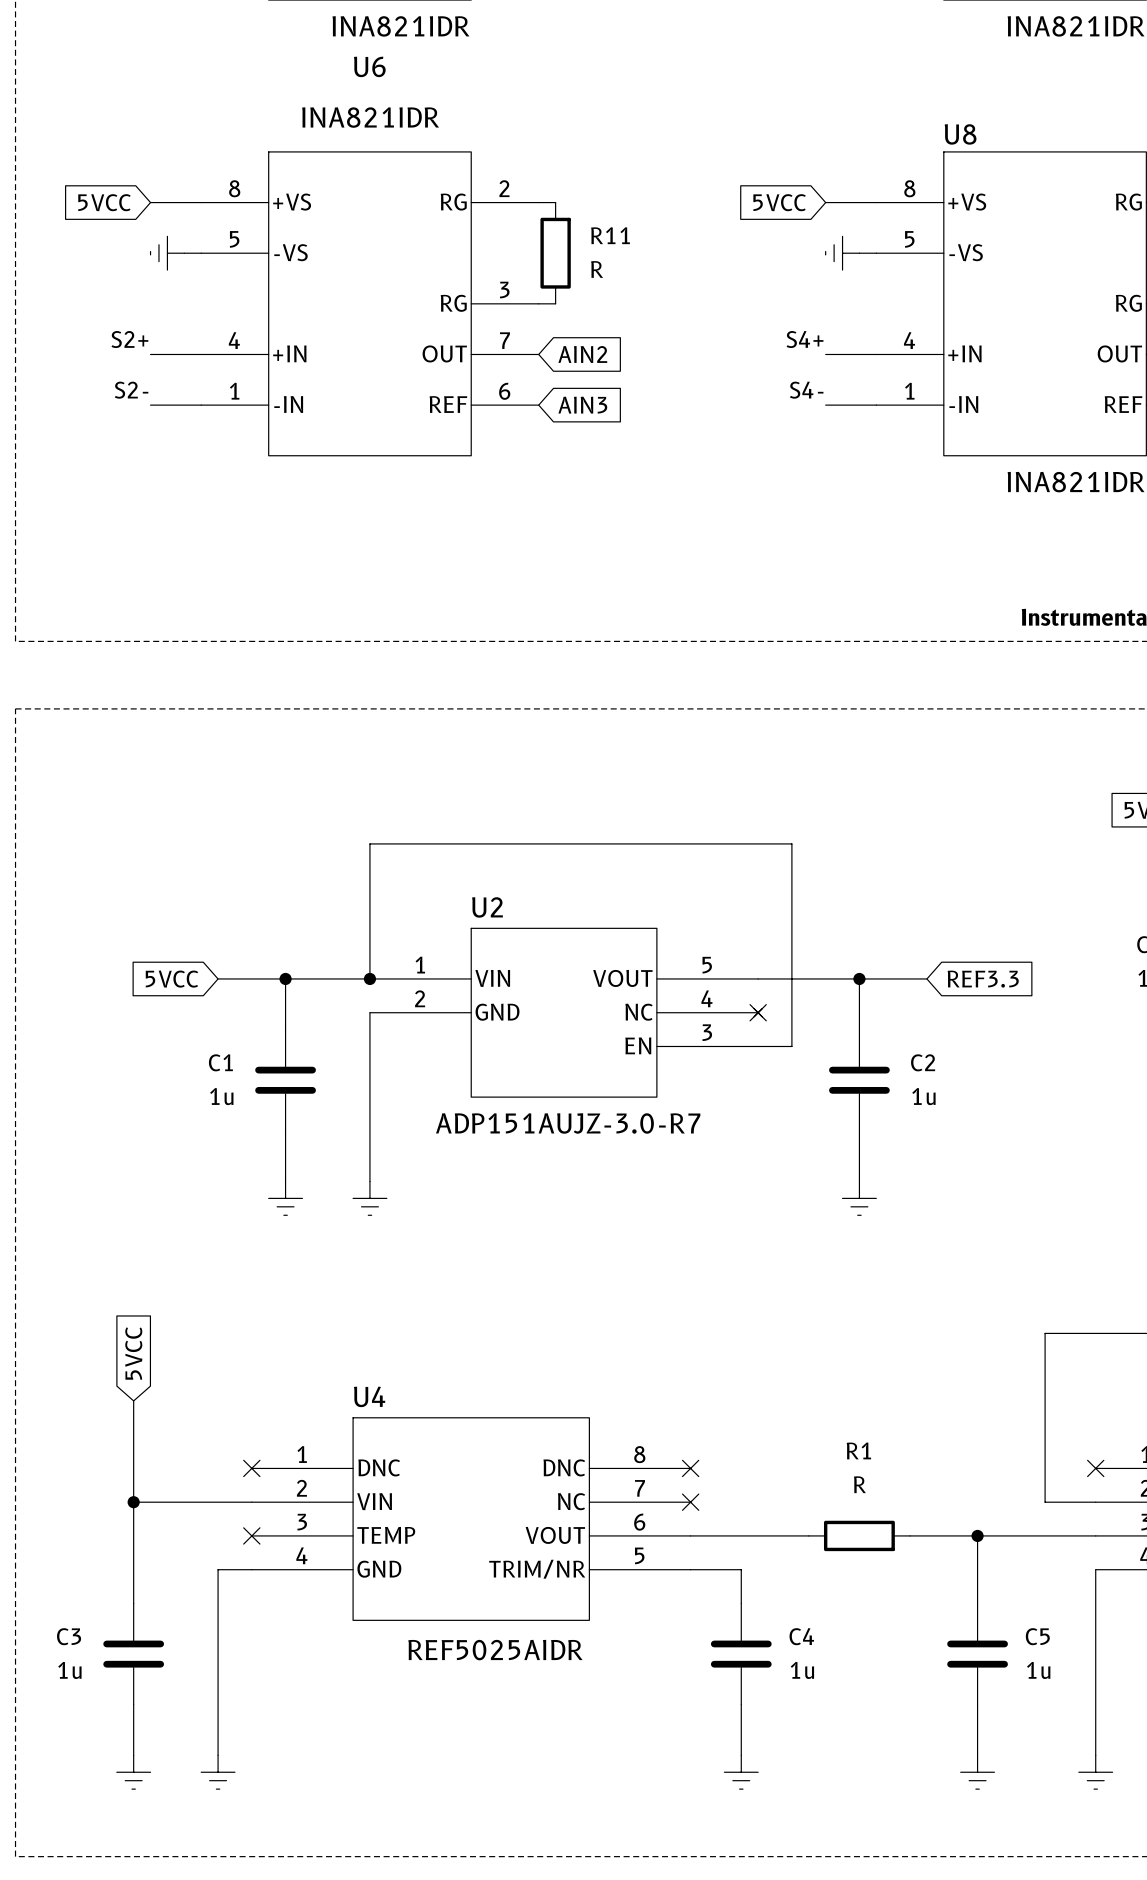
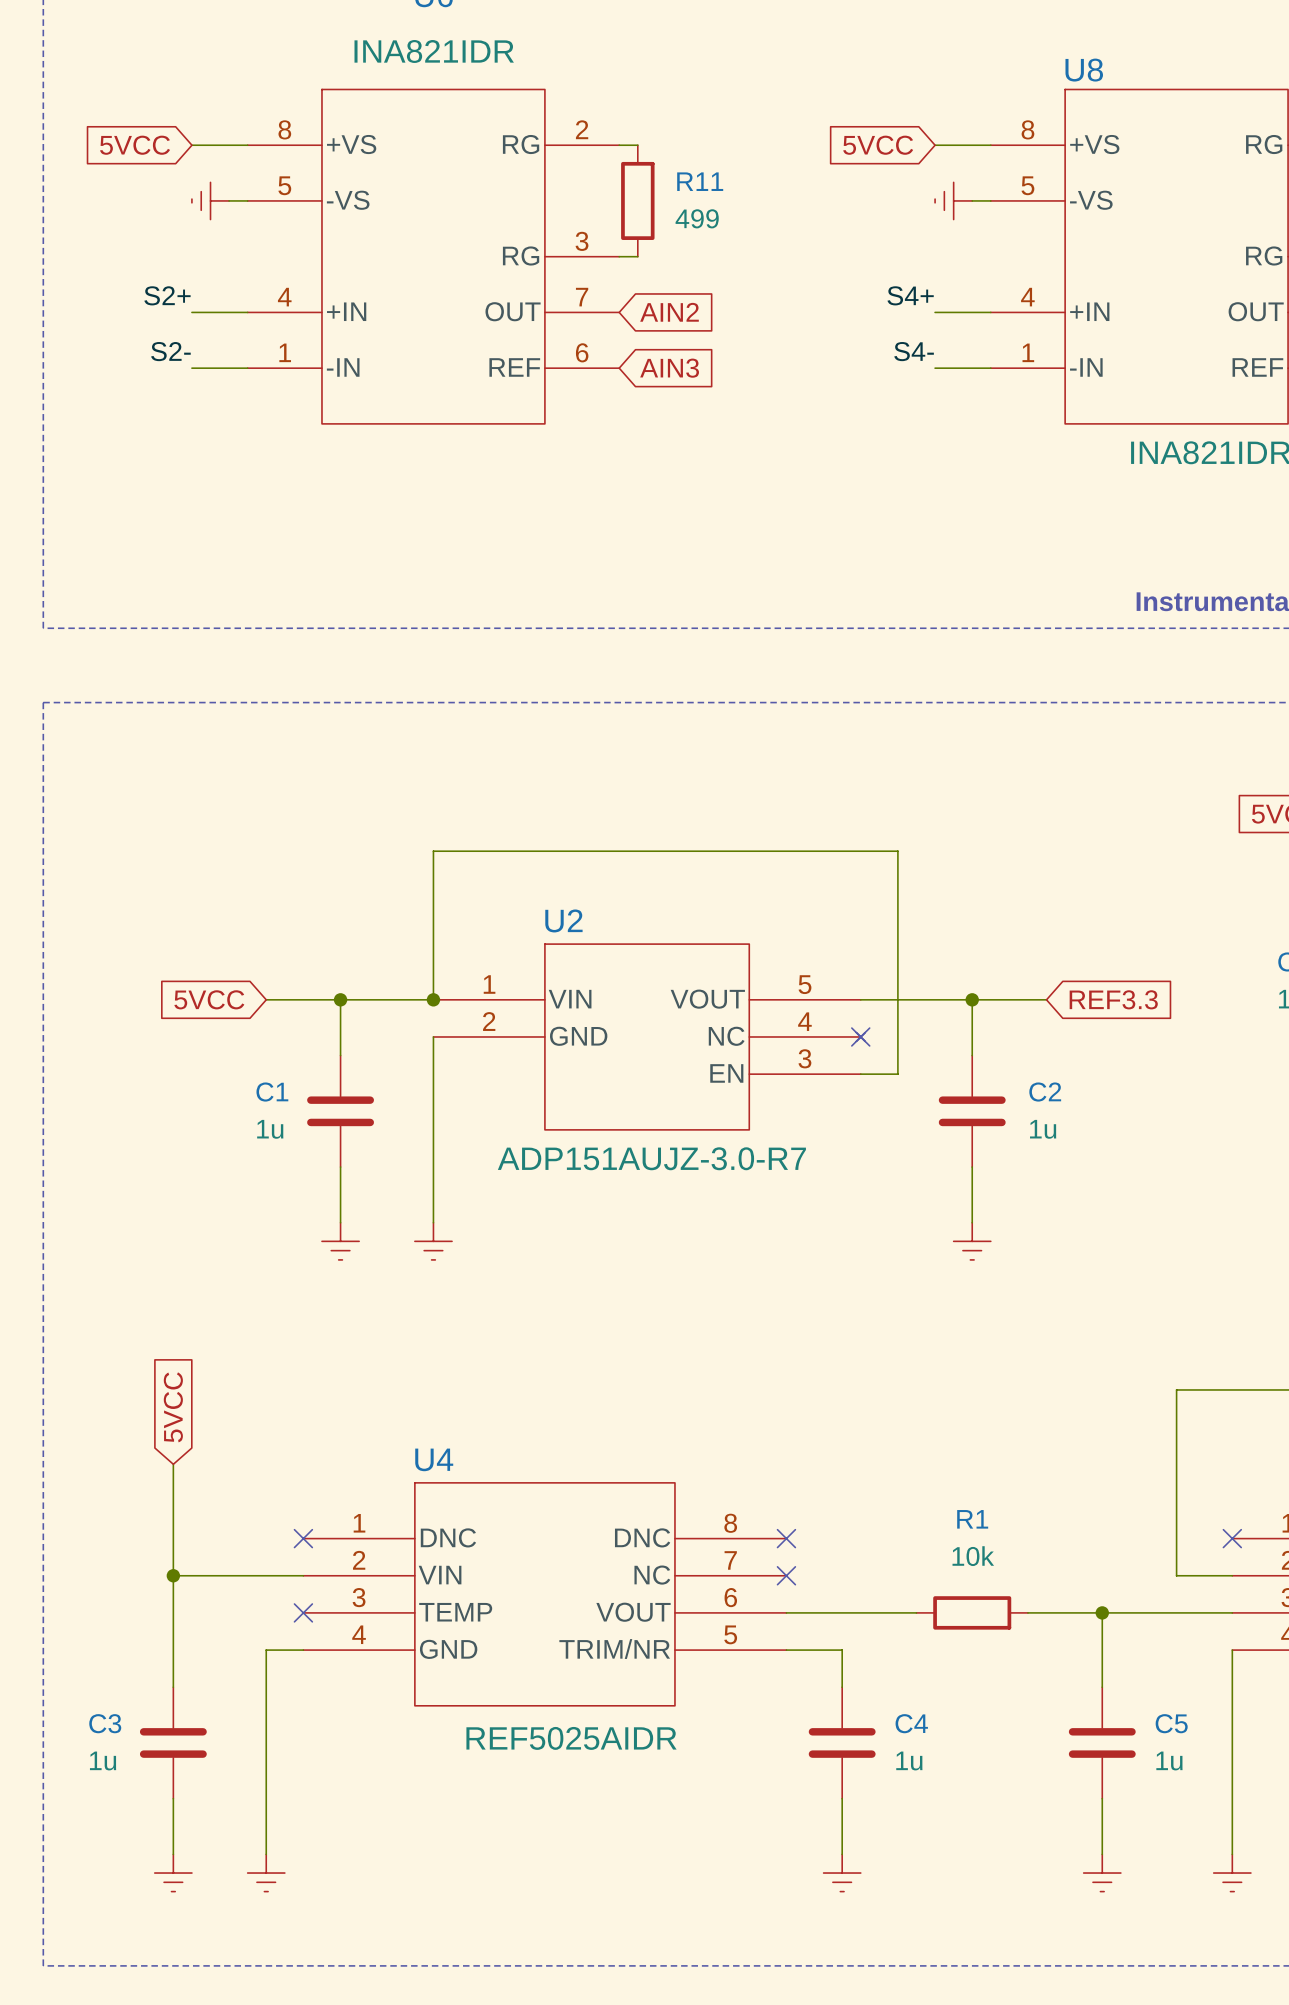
R11 value: R (597, 269) -> 499 (697, 218)
R1 value: R (859, 1484) -> 10k (973, 1556)

